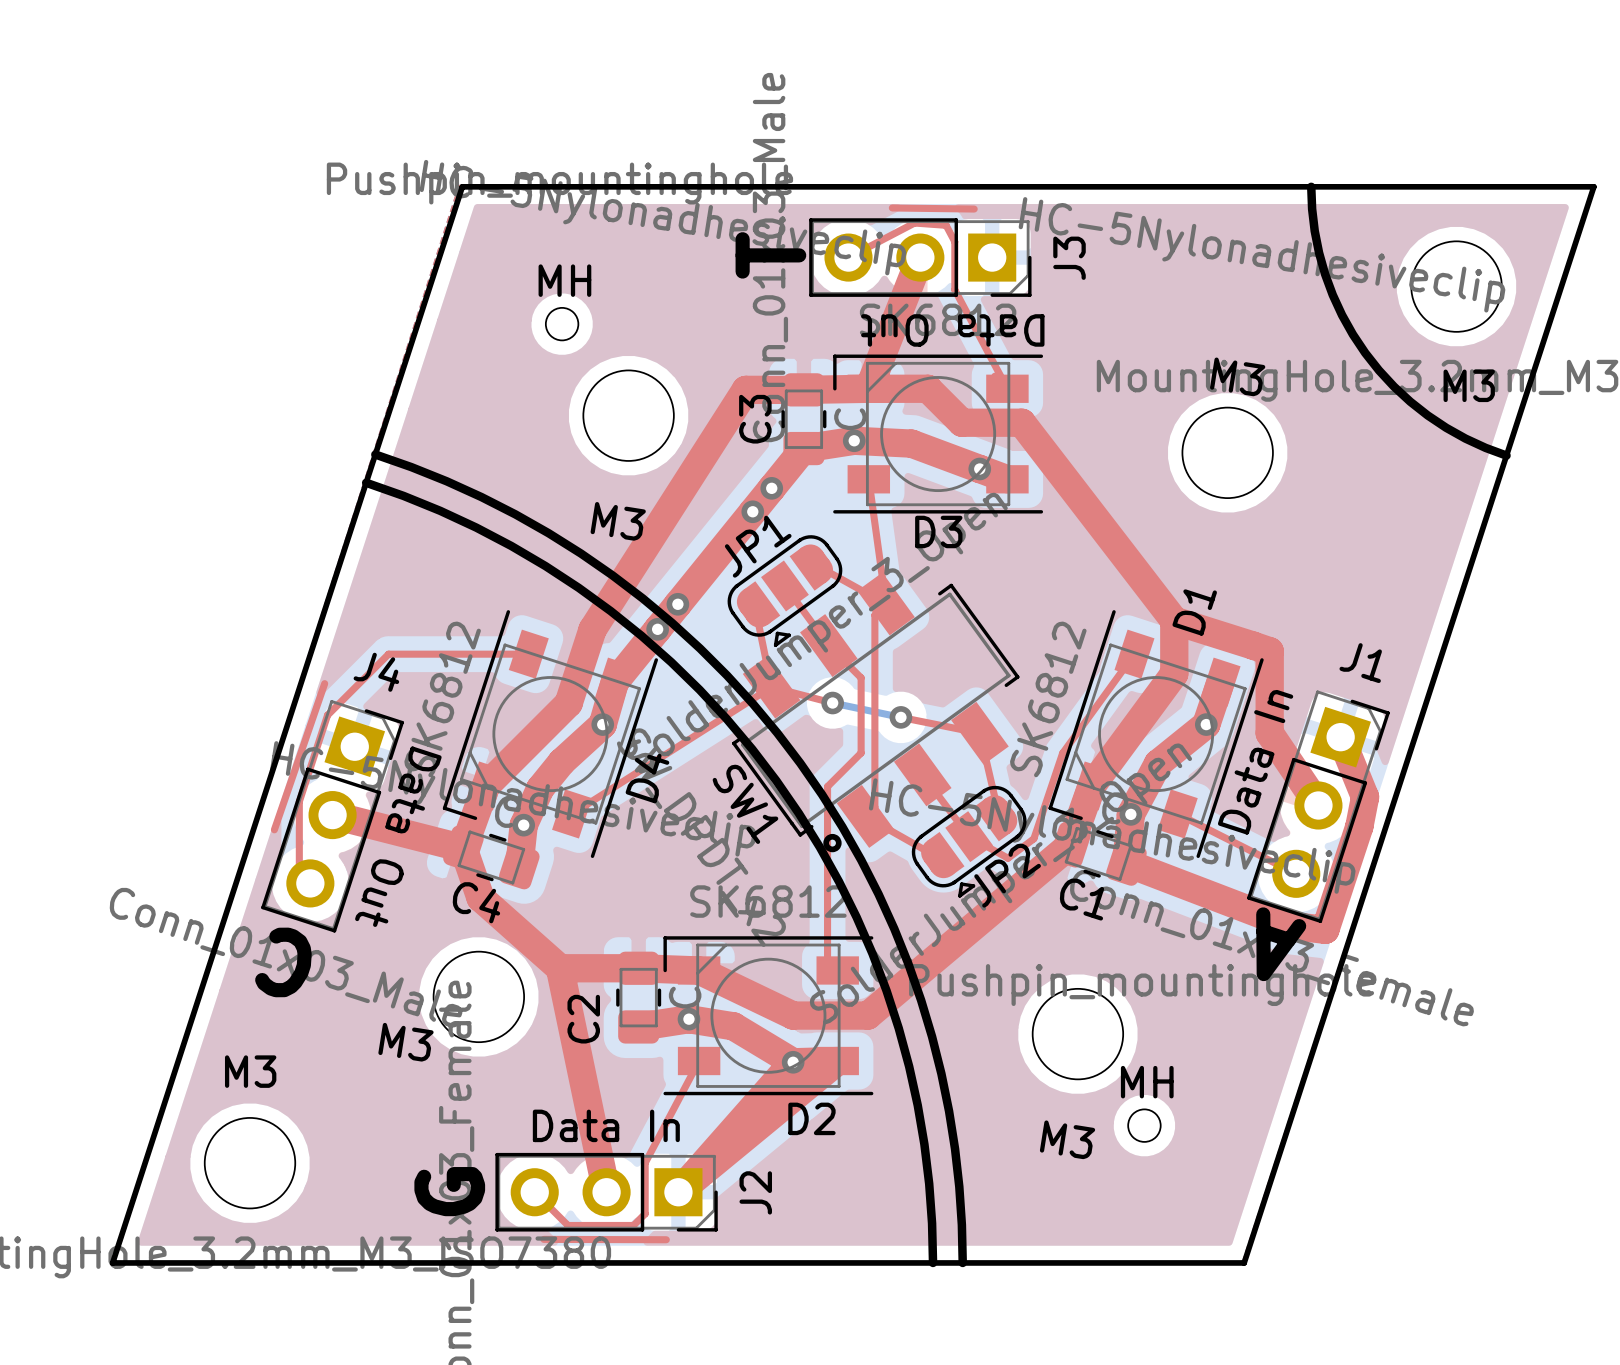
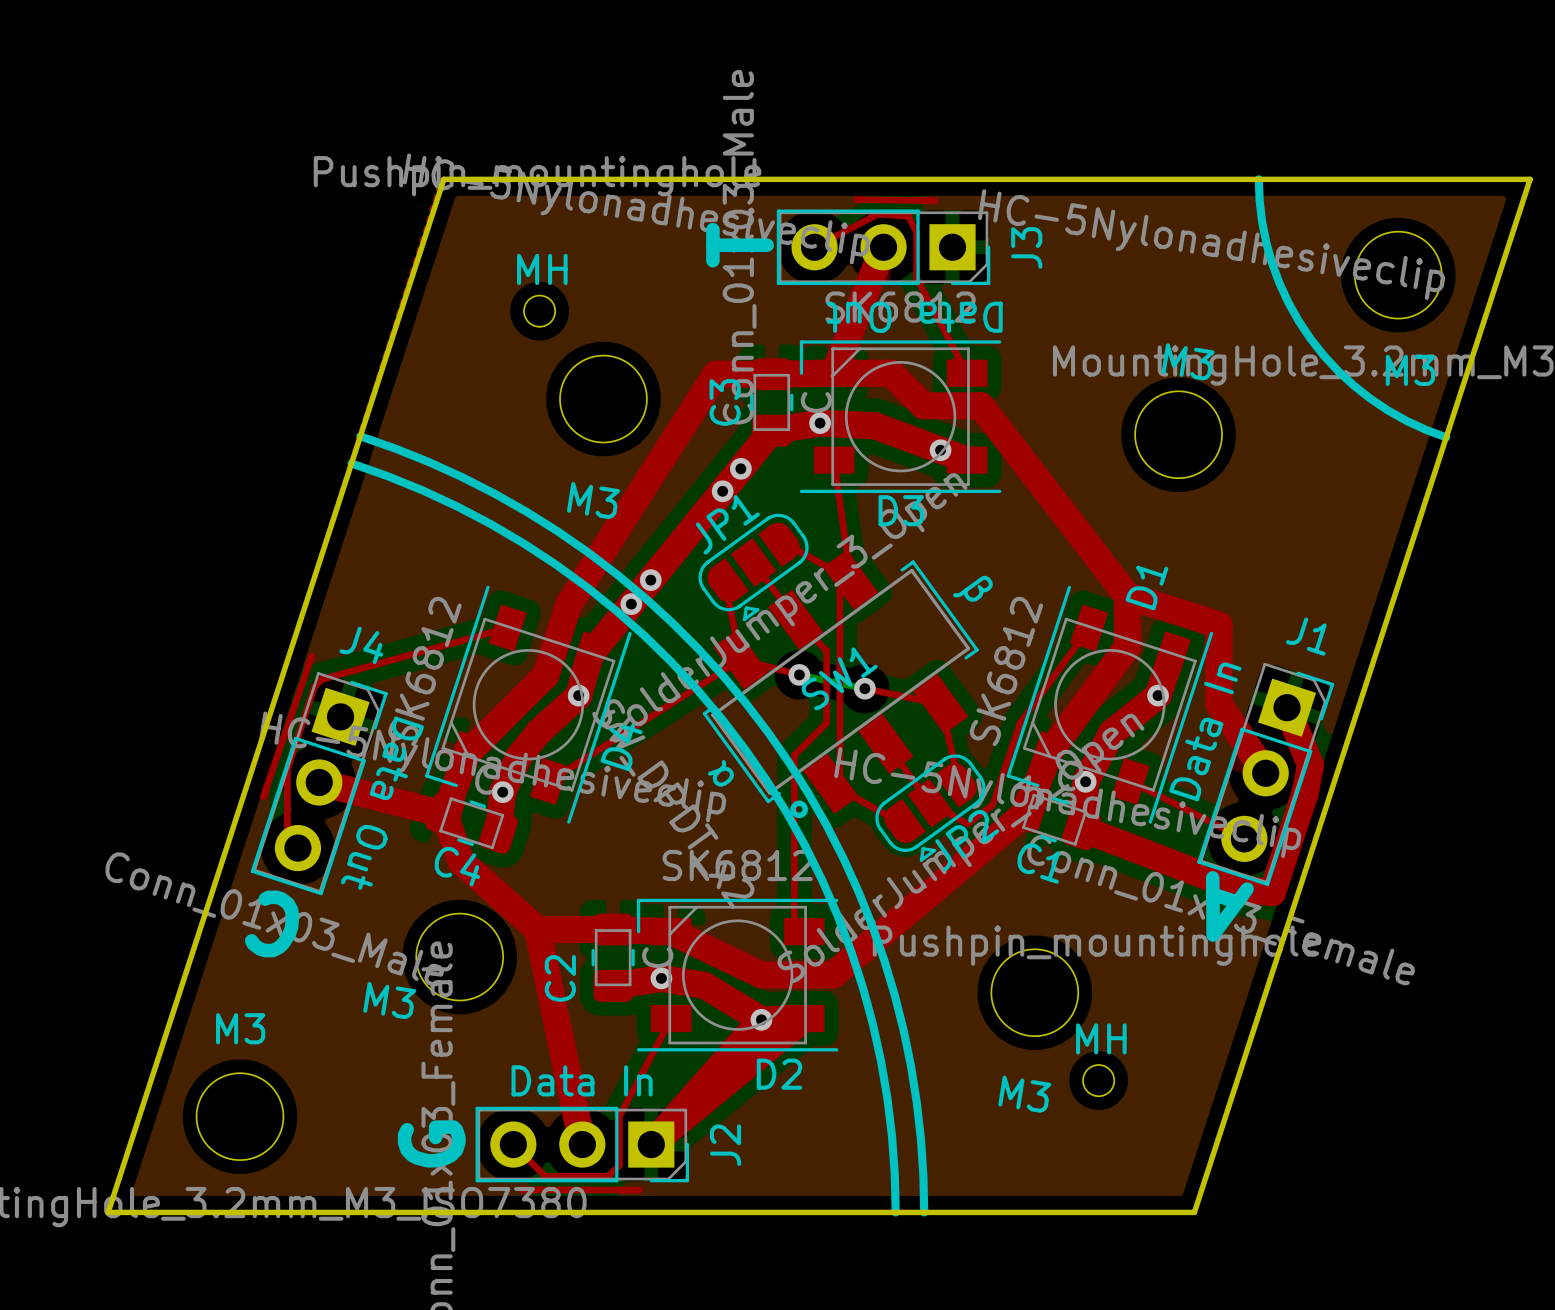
text: none -> β (972, 588)
top track: (528, 654) (388, 654) (334, 707) -> (507, 628) (321, 679)
SW1 name rotation: 0° (745, 804) -> 90° counterclockwise (839, 678)
SW1 name position: SW1 (745, 804) -> SW1 (839, 678)
text: none -> α (720, 773)

